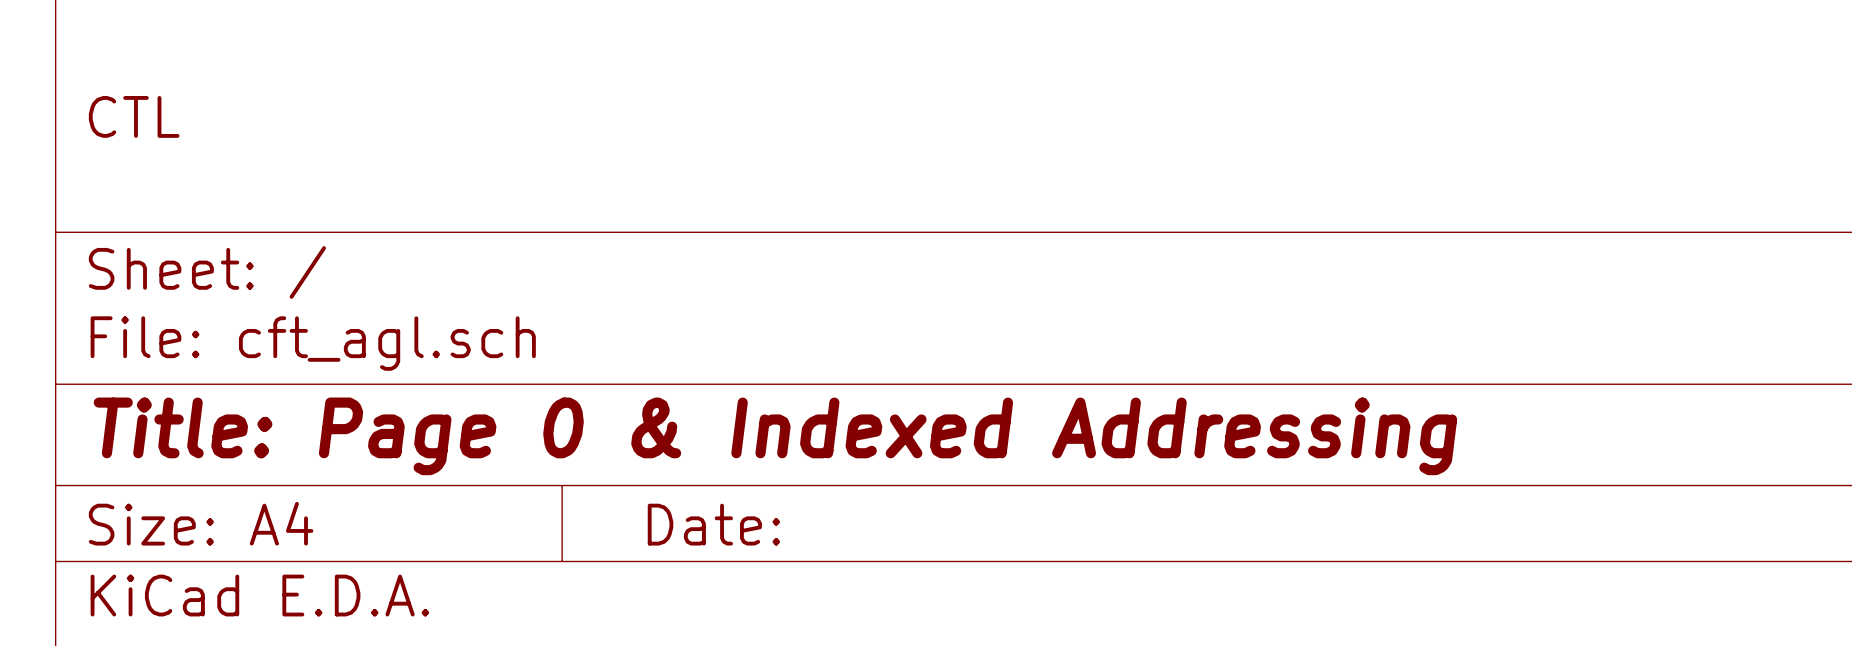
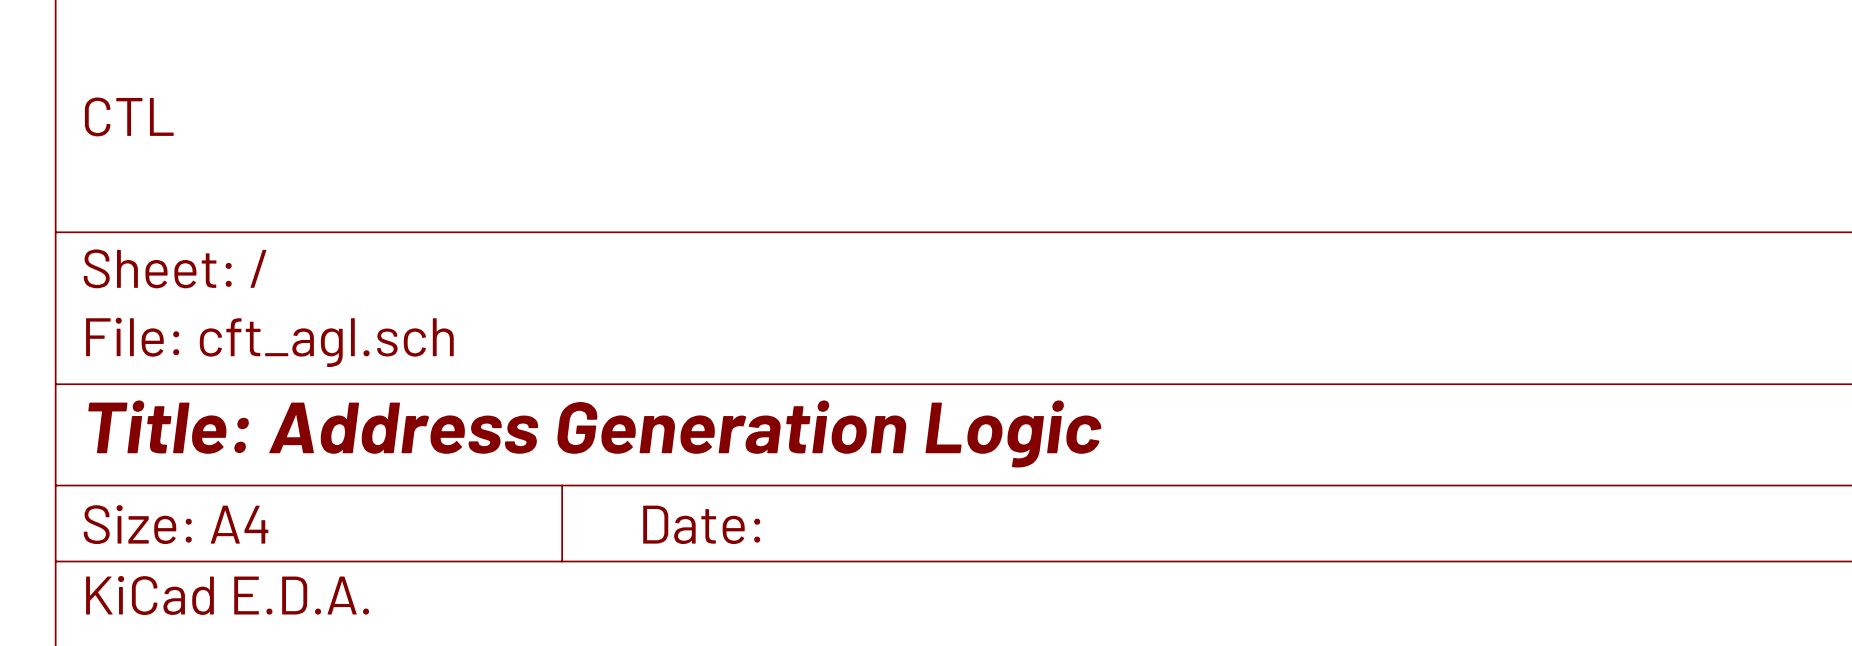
title block: Title: Page 0 & Indexed Addressing (775, 436) -> Title: Address Generation Logic (594, 433)

